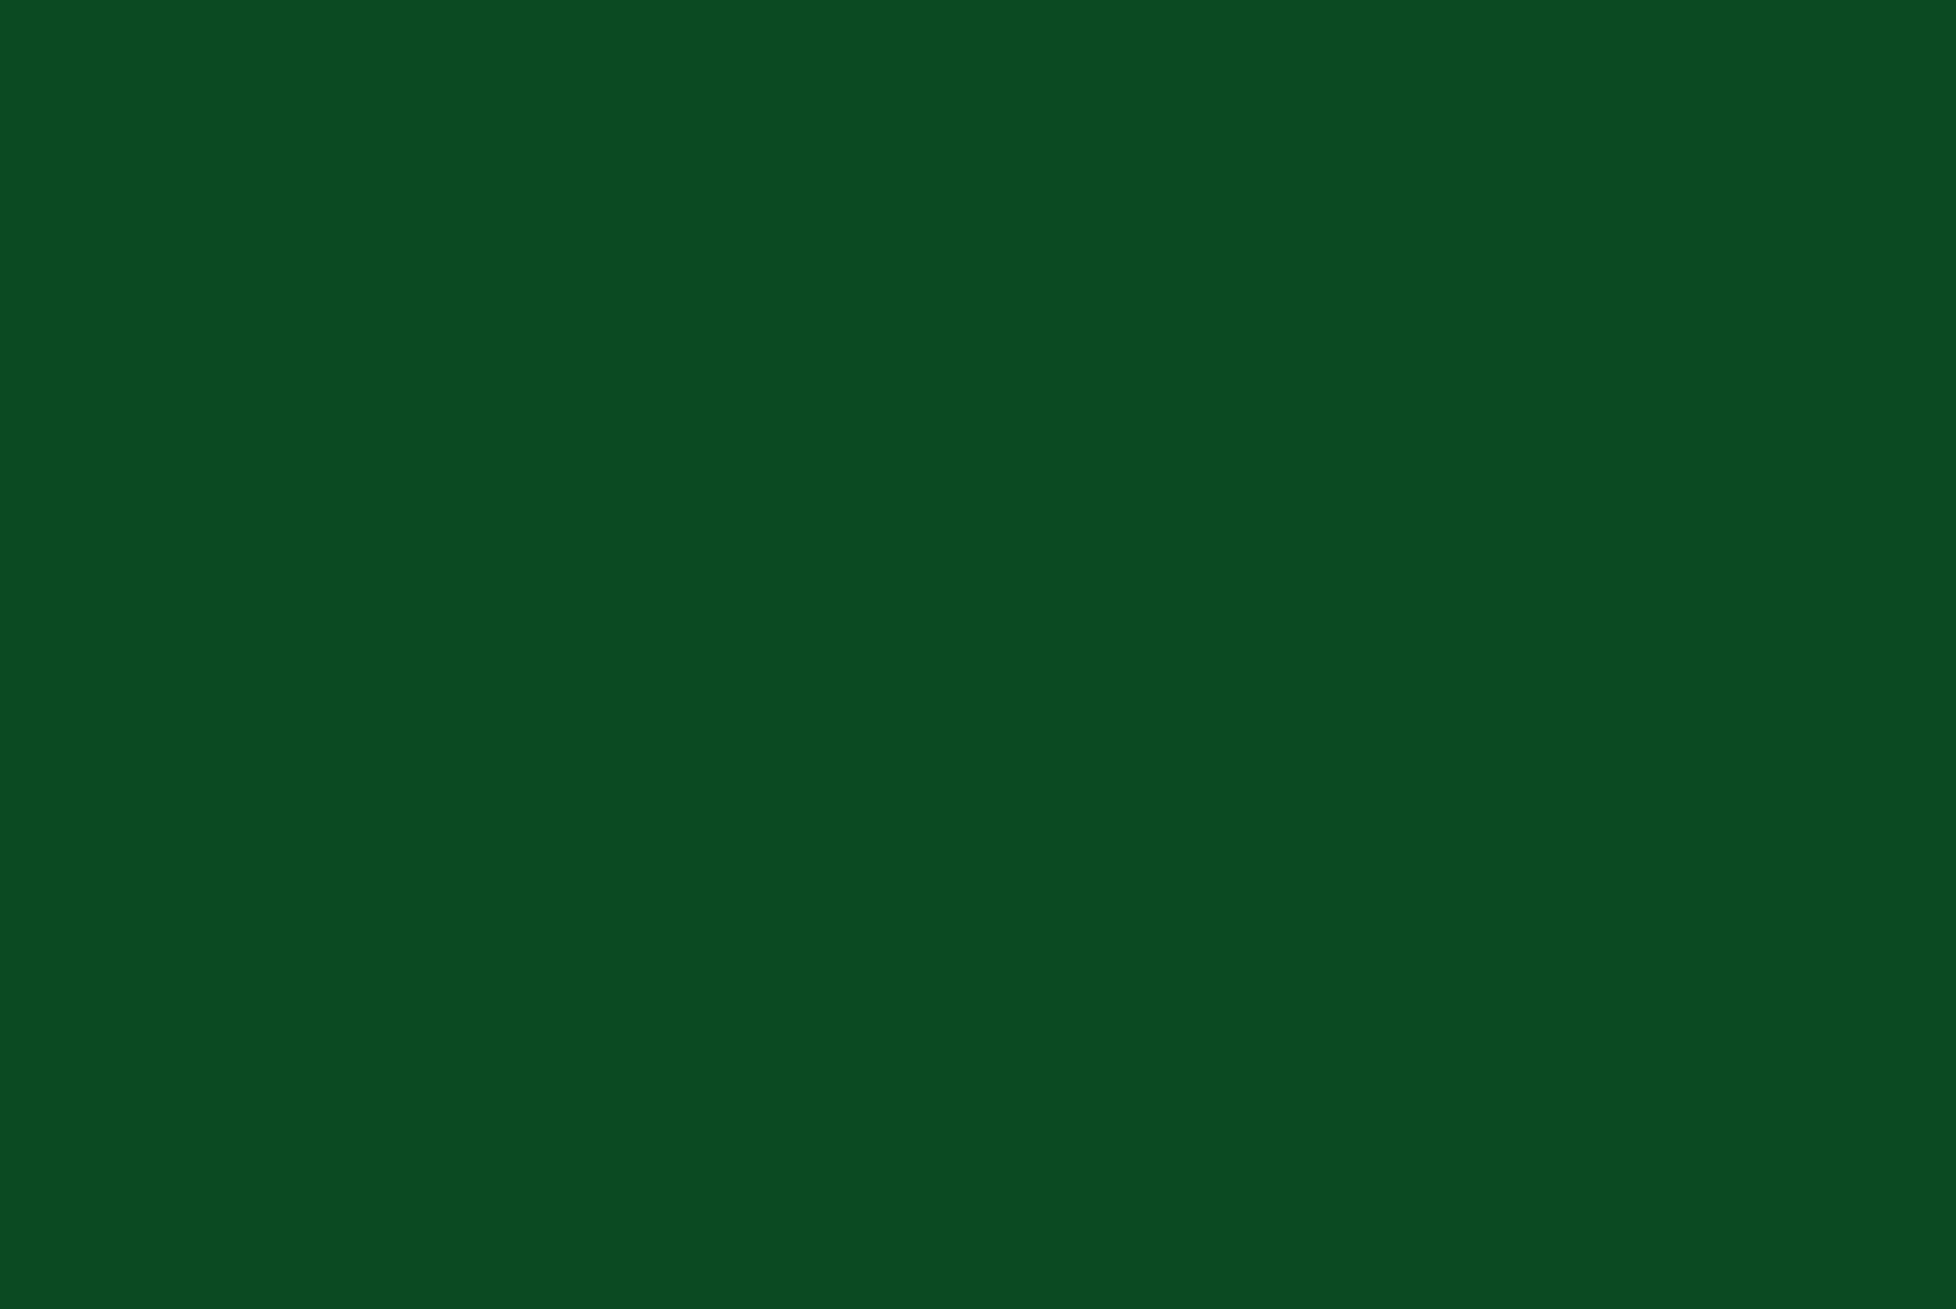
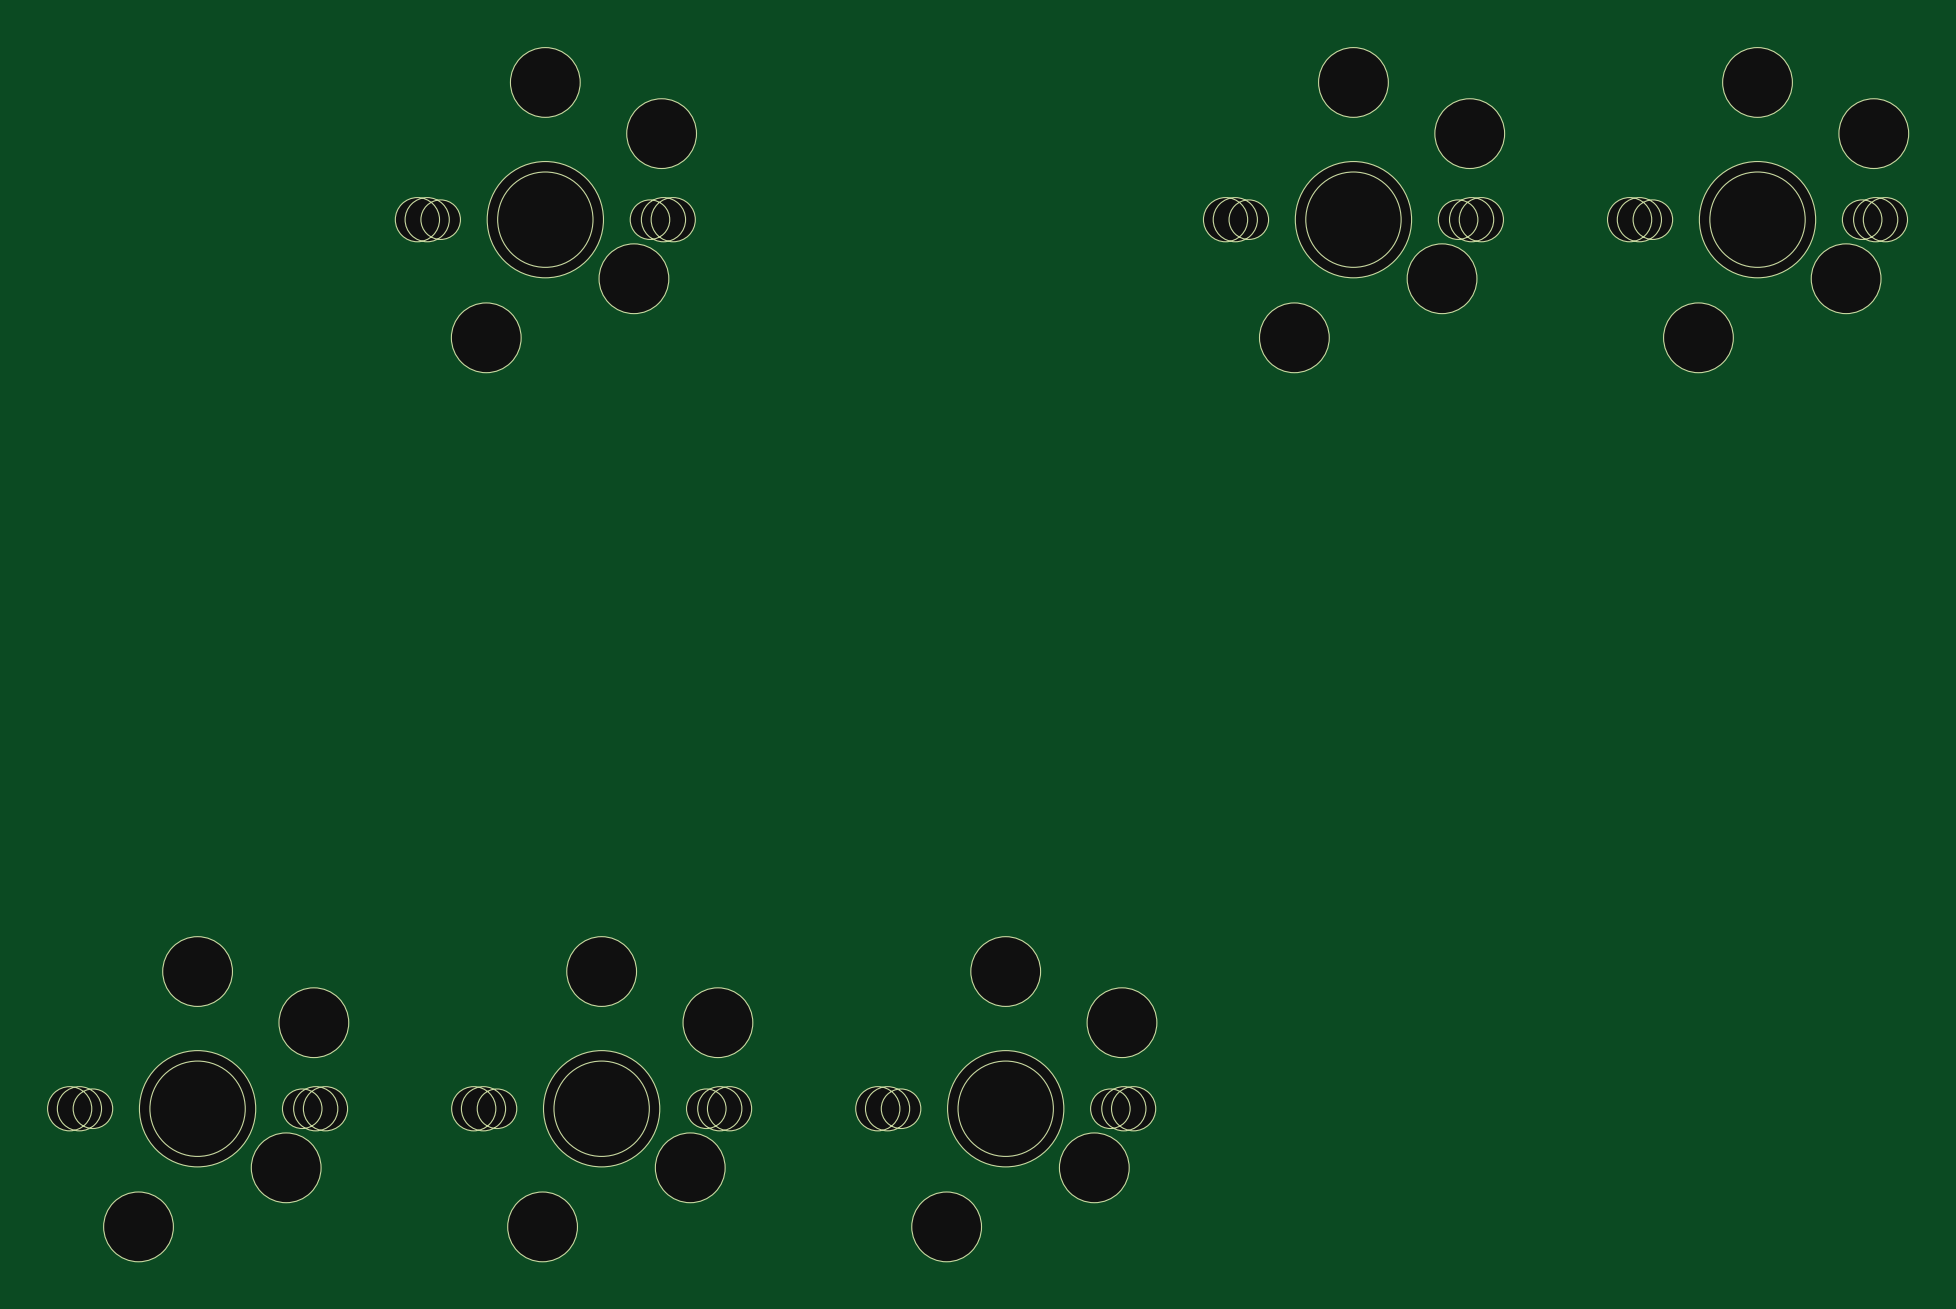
part: none -> (545, 210)
part: none -> (1354, 210)
part: none -> (1758, 210)
part: none -> (198, 1099)
part: none -> (602, 1099)
part: none -> (1006, 1099)

